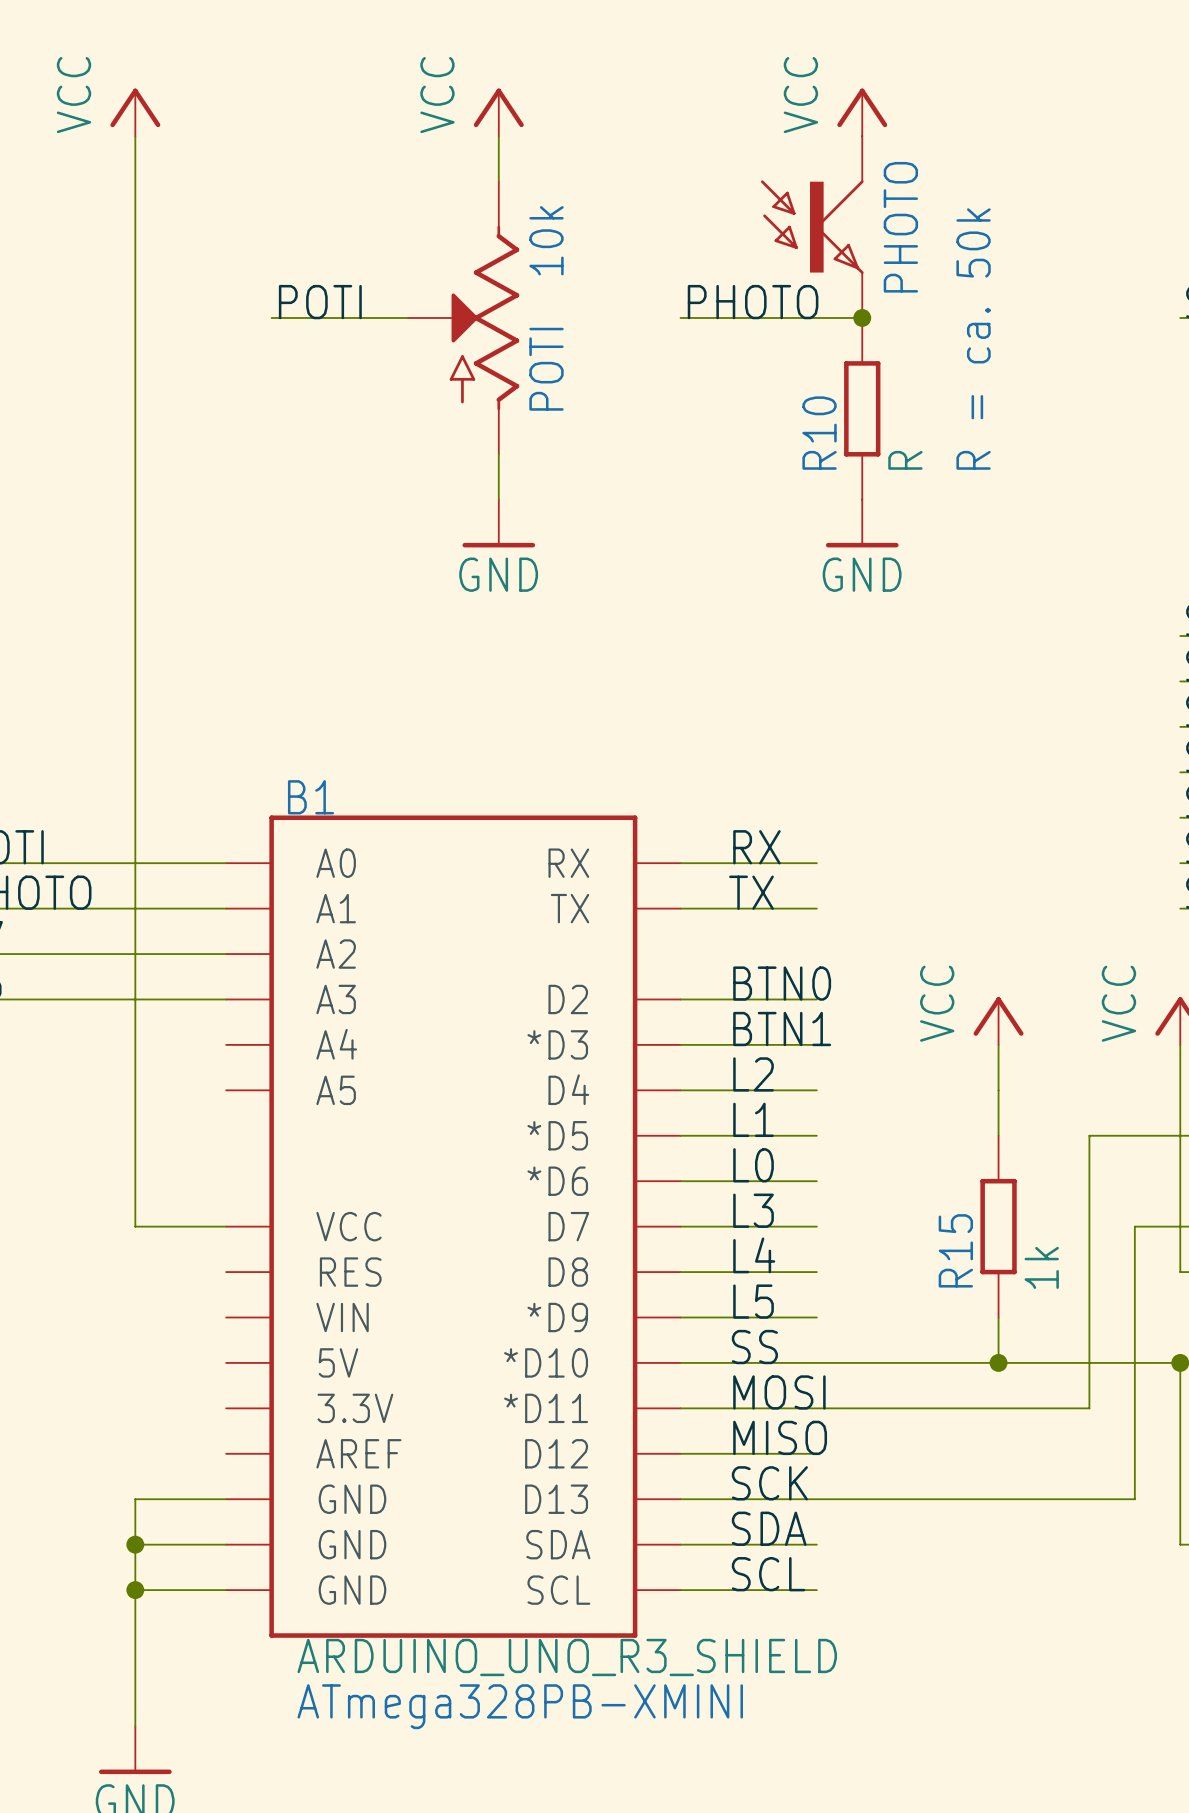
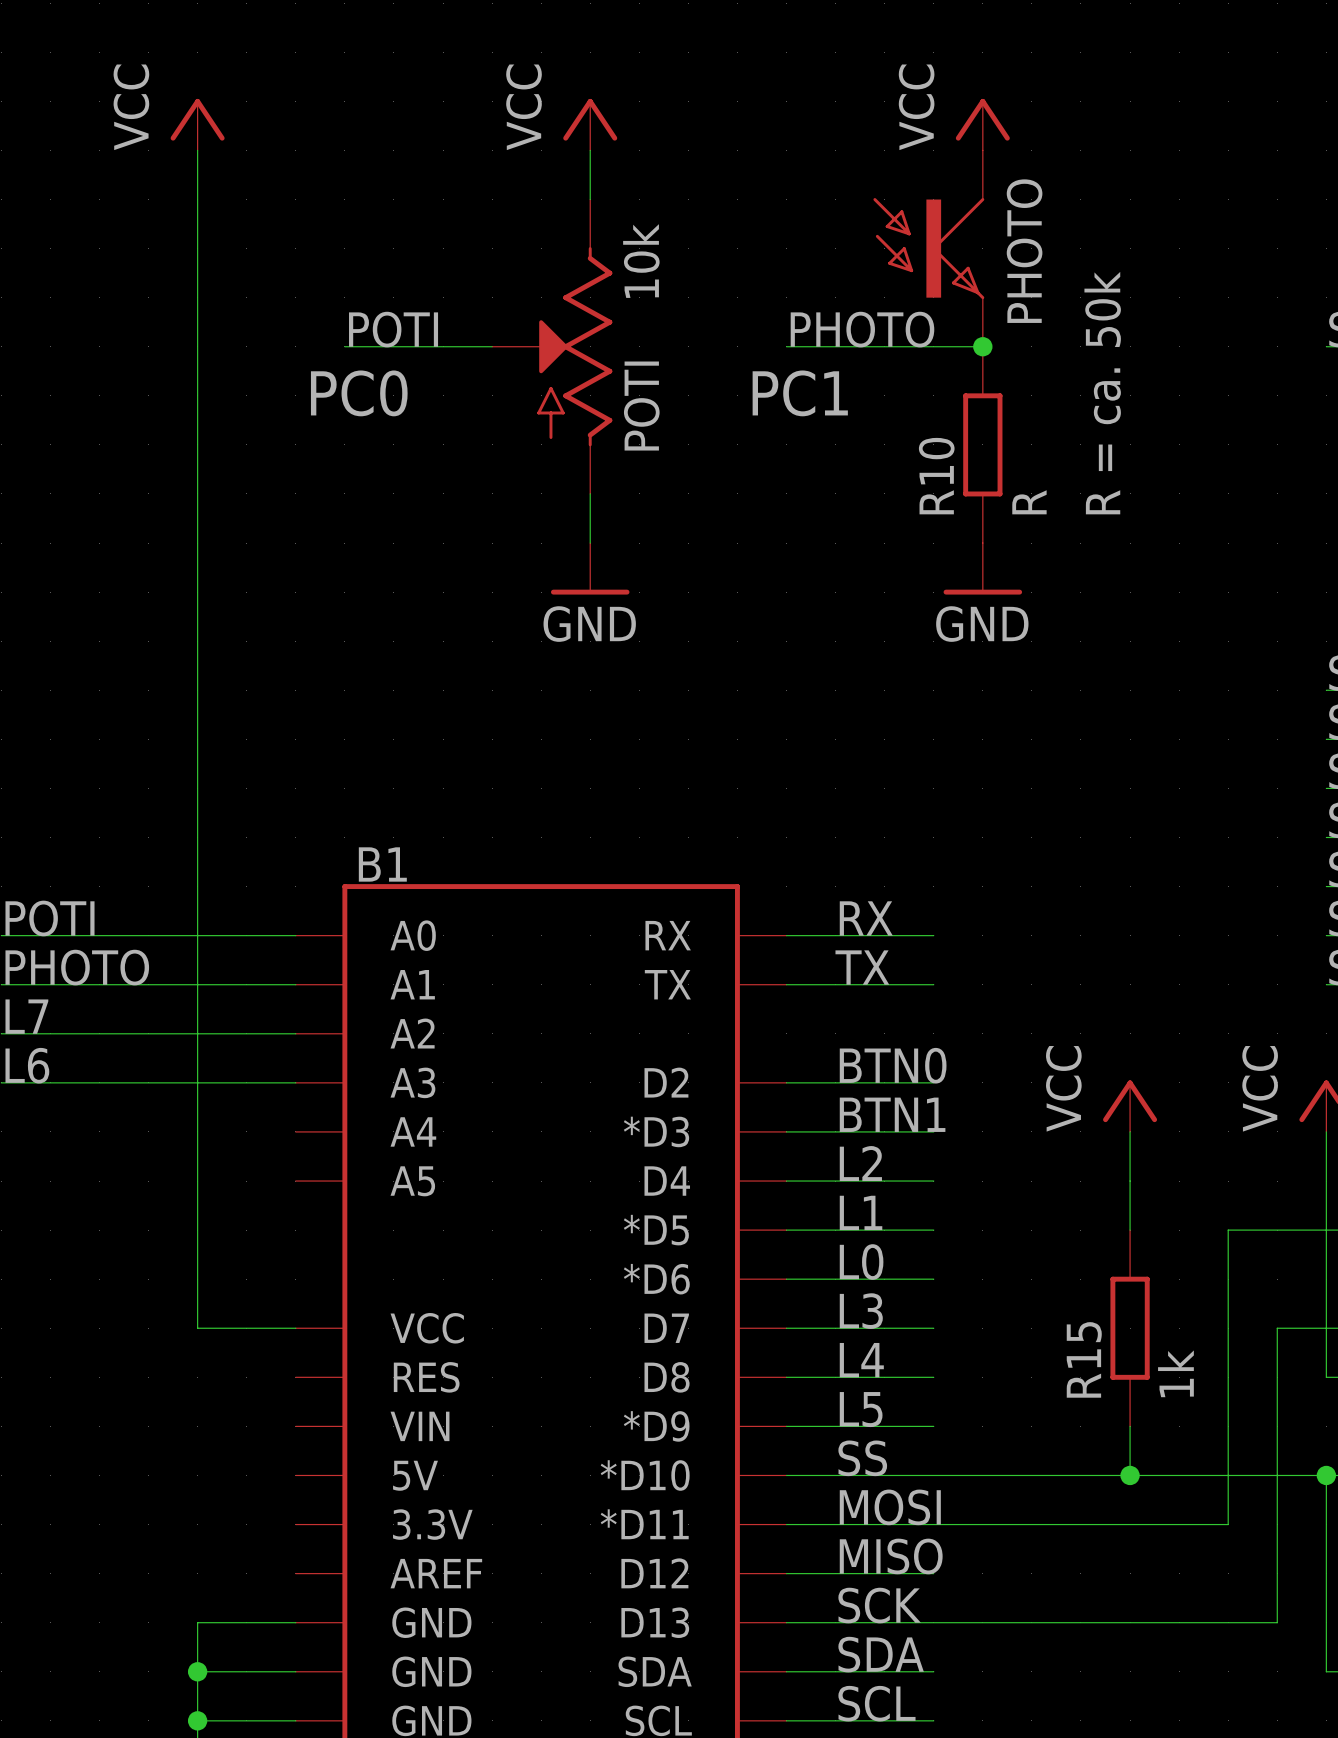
text: none -> PC0 (359, 393)
text: none -> PC1 (800, 393)

